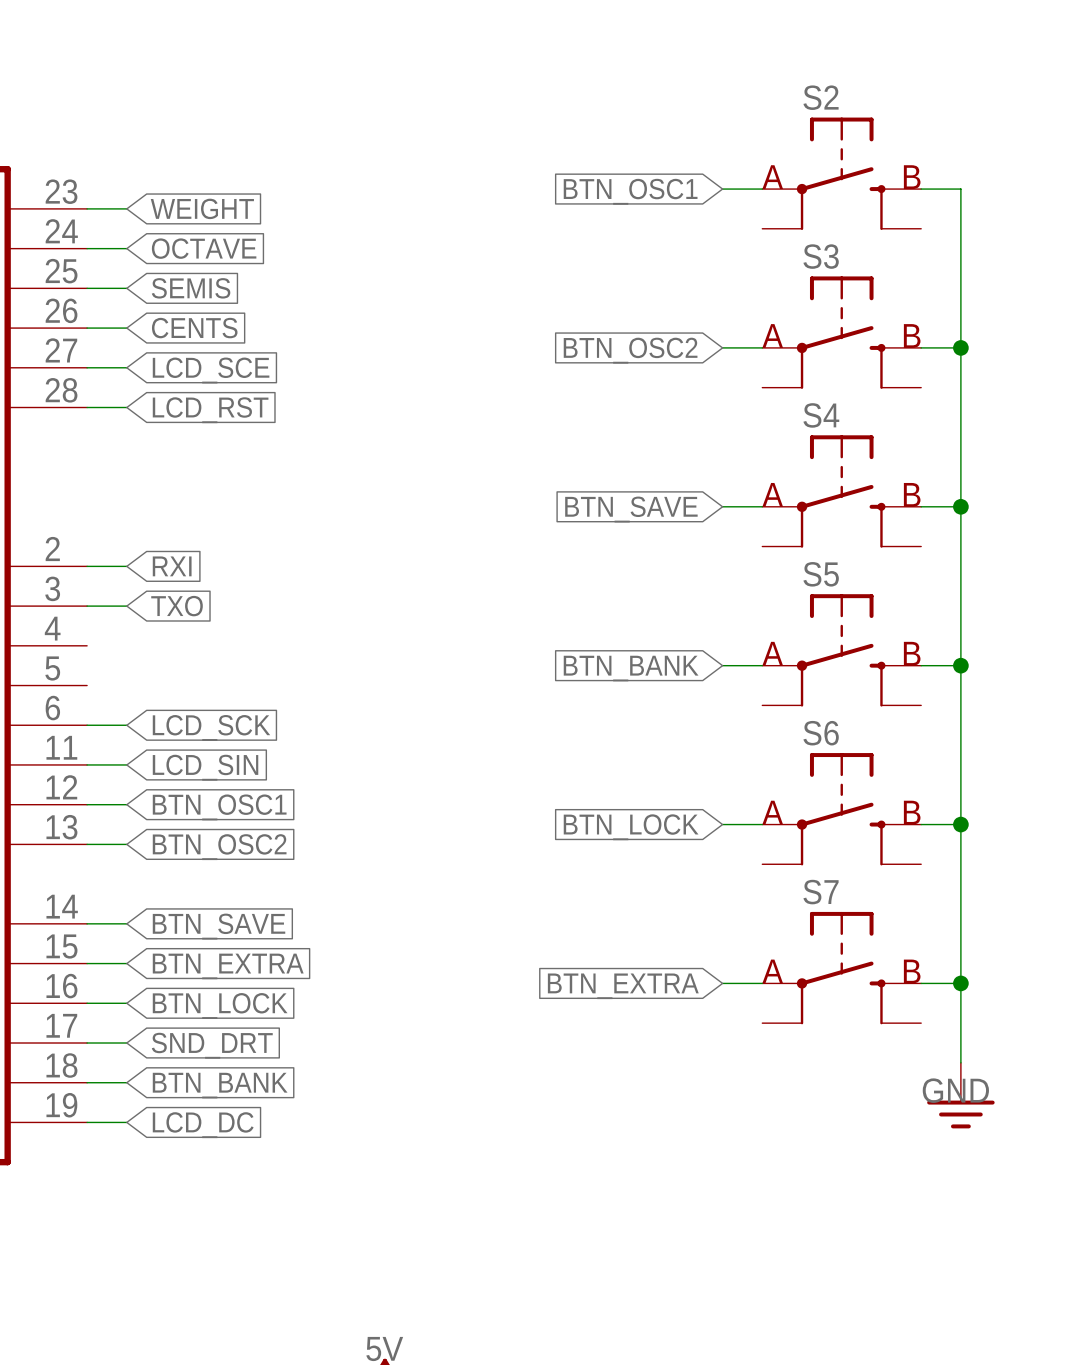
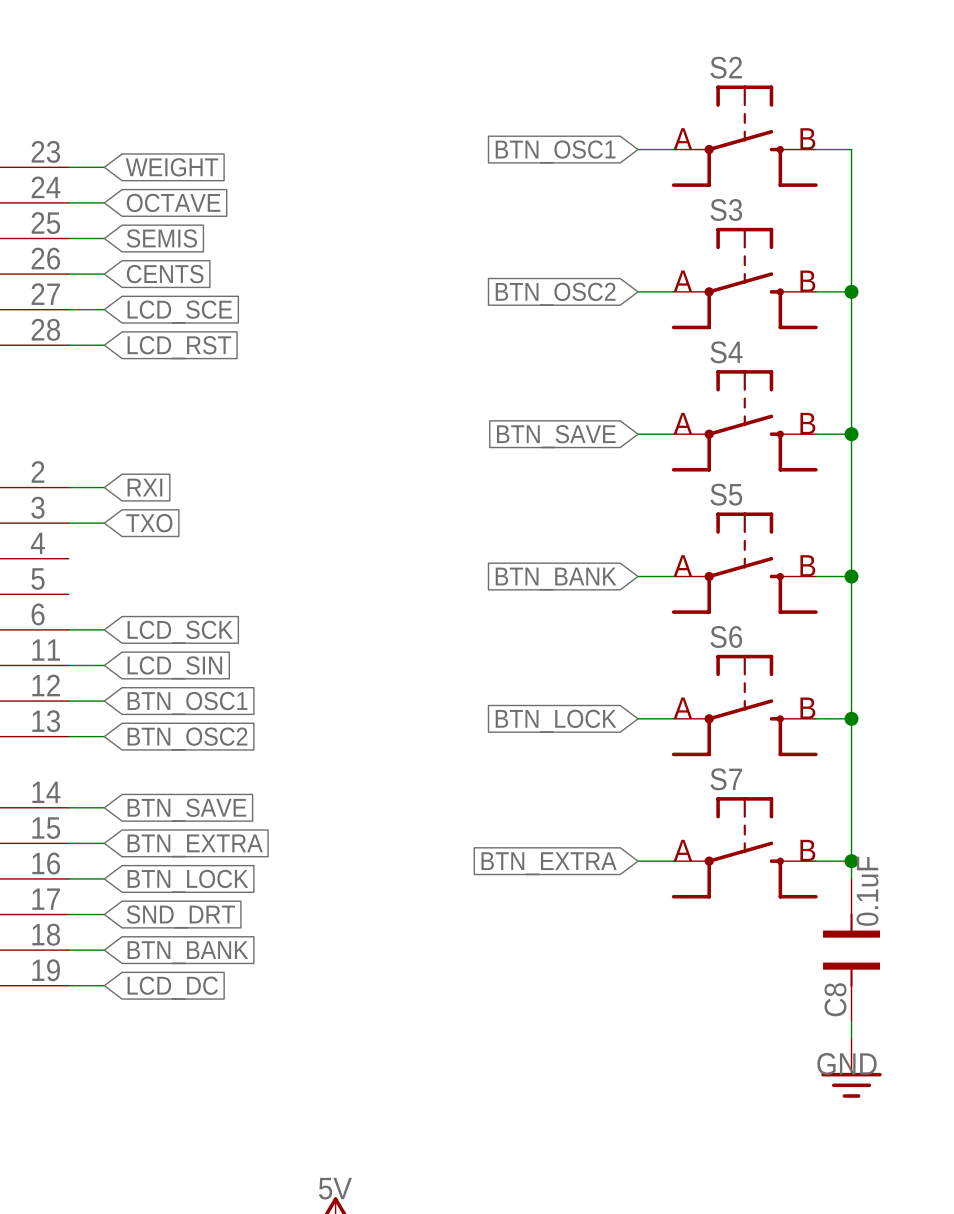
S2 symbol: [762, 117, 922, 230] -> [671, 85, 818, 187]
S3 symbol: [762, 276, 922, 389] -> [671, 227, 818, 330]
S4 symbol: [762, 435, 922, 548] -> [671, 370, 818, 472]
S5 symbol: [762, 594, 922, 707] -> [671, 512, 818, 614]
S6 symbol: [762, 753, 922, 866] -> [671, 654, 818, 757]
S7 symbol: [762, 911, 922, 1025] -> [671, 797, 818, 899]
C8: none -> 0.1uF (851, 950)
power symbol position: GND (960, 1095) -> GND (851, 1068)
wire: none -> (851, 1021) (851, 1039)

